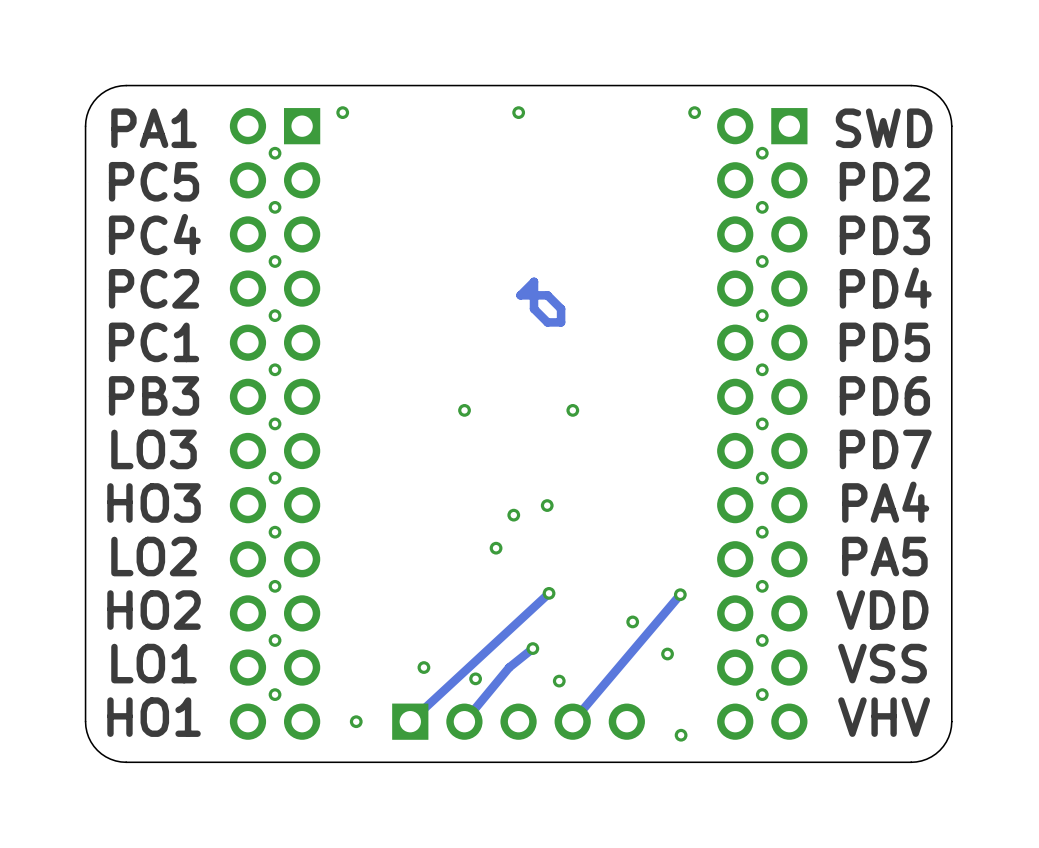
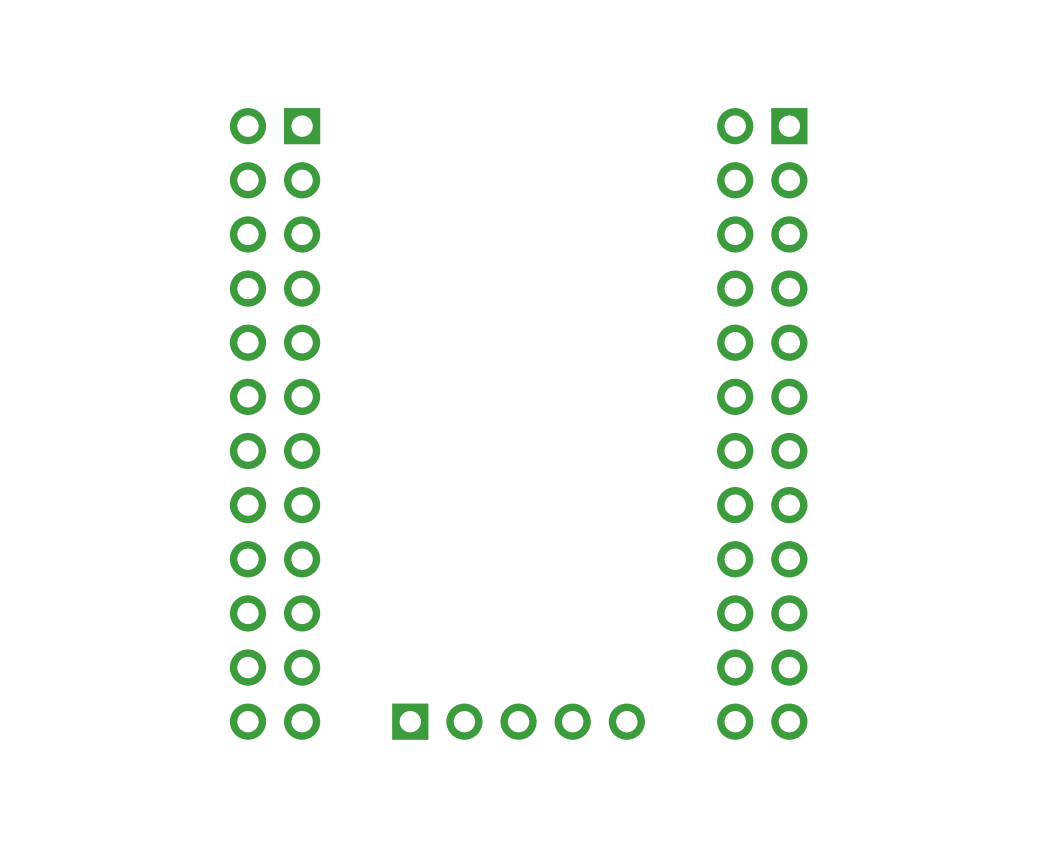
board edge: (911, 85) (126, 85) (115, 86) (101, 93) (90, 105) (85, 126) (85, 721) (86, 732) (93, 746) (110, 759) (126, 762) (911, 762) (921, 760) (935, 753) (946, 741) (951, 721) (951, 126) (948, 110) (939, 97) (926, 88) (911, 85) -> none
via: (342, 112) -> none
via: (518, 112) -> none
via: (694, 112) -> none
text: PA1 (154, 128) -> none
text: SWD (884, 128) -> none
via: (275, 153) -> none
via: (762, 153) -> none
text: PC5 (154, 181) -> none
text: PD2 (884, 181) -> none
via: (275, 207) -> none
via: (762, 207) -> none
text: PC4 (154, 234) -> none
text: PD3 (884, 235) -> none
via: (275, 261) -> none
via: (762, 261) -> none
track: (534, 281) (534, 308) (547, 322) (561, 322) (561, 308) (547, 295) (520, 295) (534, 281) -> none
text: PC2 (154, 288) -> none
text: PD4 (885, 288) -> none
via: (275, 315) -> none
via: (762, 315) -> none
text: PC1 (154, 342) -> none
text: PD5 (884, 342) -> none
via: (275, 369) -> none
via: (762, 369) -> none
text: PB3 (154, 395) -> none
text: PD6 (884, 395) -> none
via: (464, 410) -> none
via: (572, 410) -> none
via: (275, 423) -> none
via: (762, 423) -> none
text: LO3 (154, 449) -> none
text: PD7 (885, 449) -> none
via: (275, 478) -> none
via: (762, 478) -> none
text: HO3 (154, 502) -> none
text: PA4 (885, 502) -> none
via: (547, 505) -> none
via: (513, 515) -> none
via: (275, 532) -> none
via: (762, 532) -> none
via: (496, 548) -> none
text: LO2 (154, 556) -> none
text: PA5 (884, 556) -> none
via: (275, 586) -> none
via: (762, 586) -> none
track: (549, 593) (410, 721) -> none
via: (549, 593) -> none
track: (680, 594) (572, 721) -> none
via: (680, 594) -> none
text: HO2 (154, 610) -> none
text: VDD (882, 610) -> none
via: (632, 621) -> none
via: (275, 640) -> none
via: (762, 640) -> none
track: (532, 648) (509, 667) (464, 721) -> none
via: (532, 648) -> none
via: (667, 654) -> none
text: LO1 (154, 663) -> none
text: VSS (882, 663) -> none
via: (423, 667) -> none
via: (475, 678) -> none
via: (559, 681) -> none
via: (275, 694) -> none
via: (762, 694) -> none
text: HO1 (154, 717) -> none
text: VHV (884, 717) -> none
via: (356, 721) -> none
via: (681, 735) -> none

